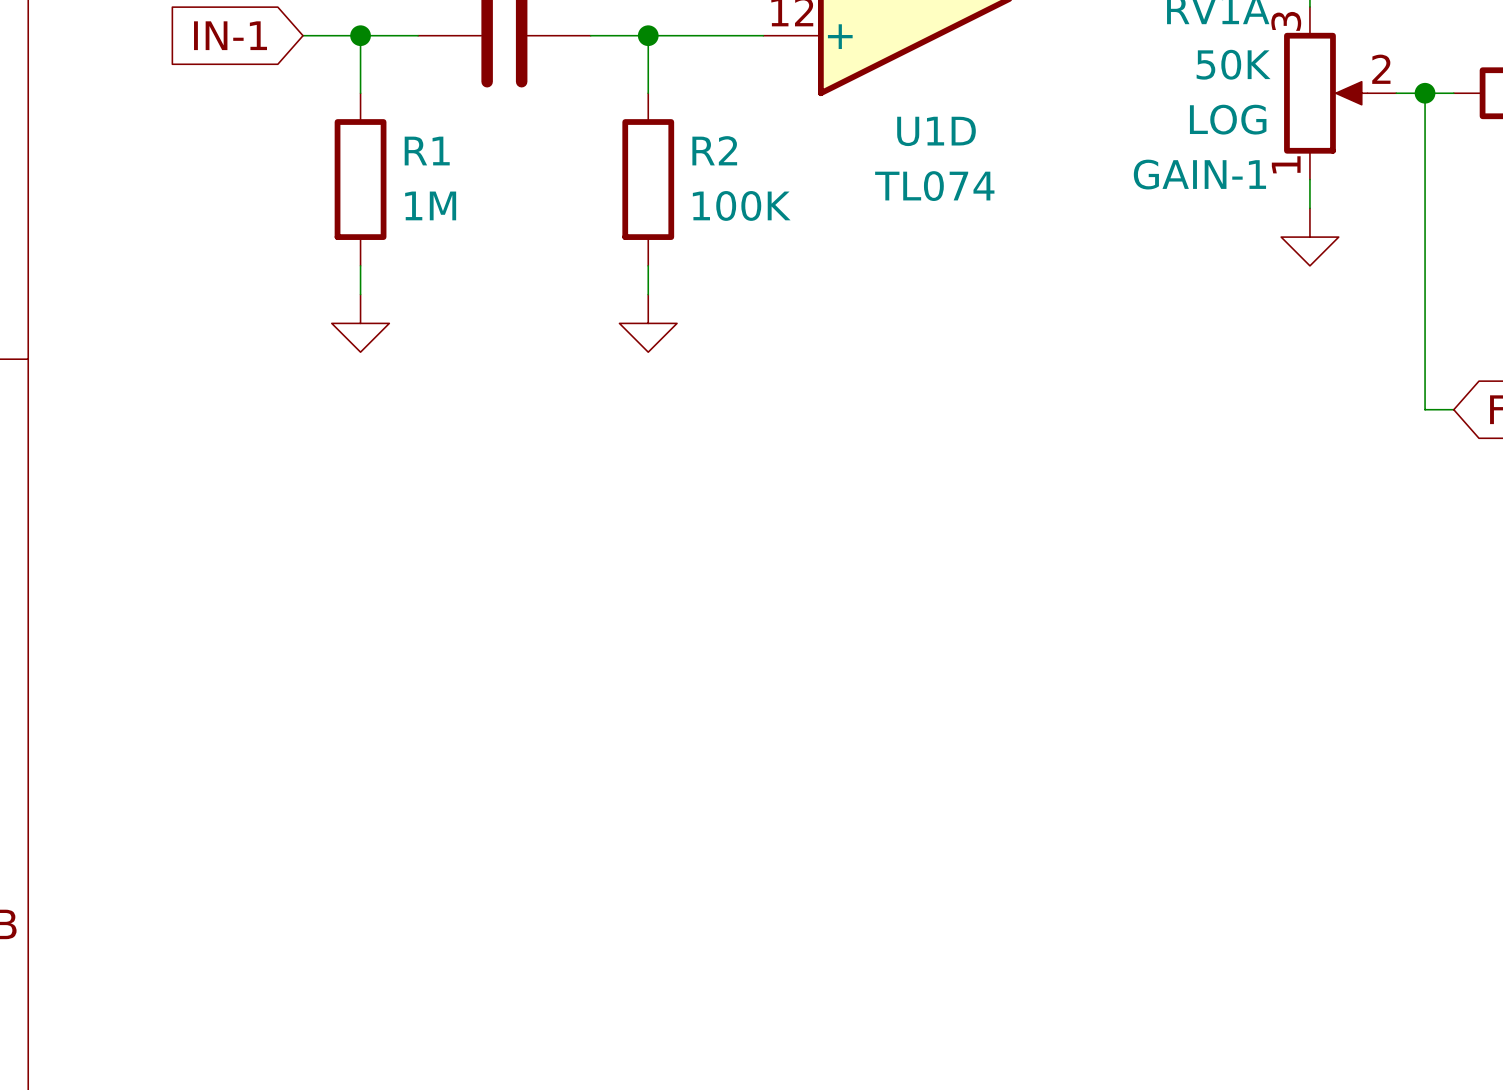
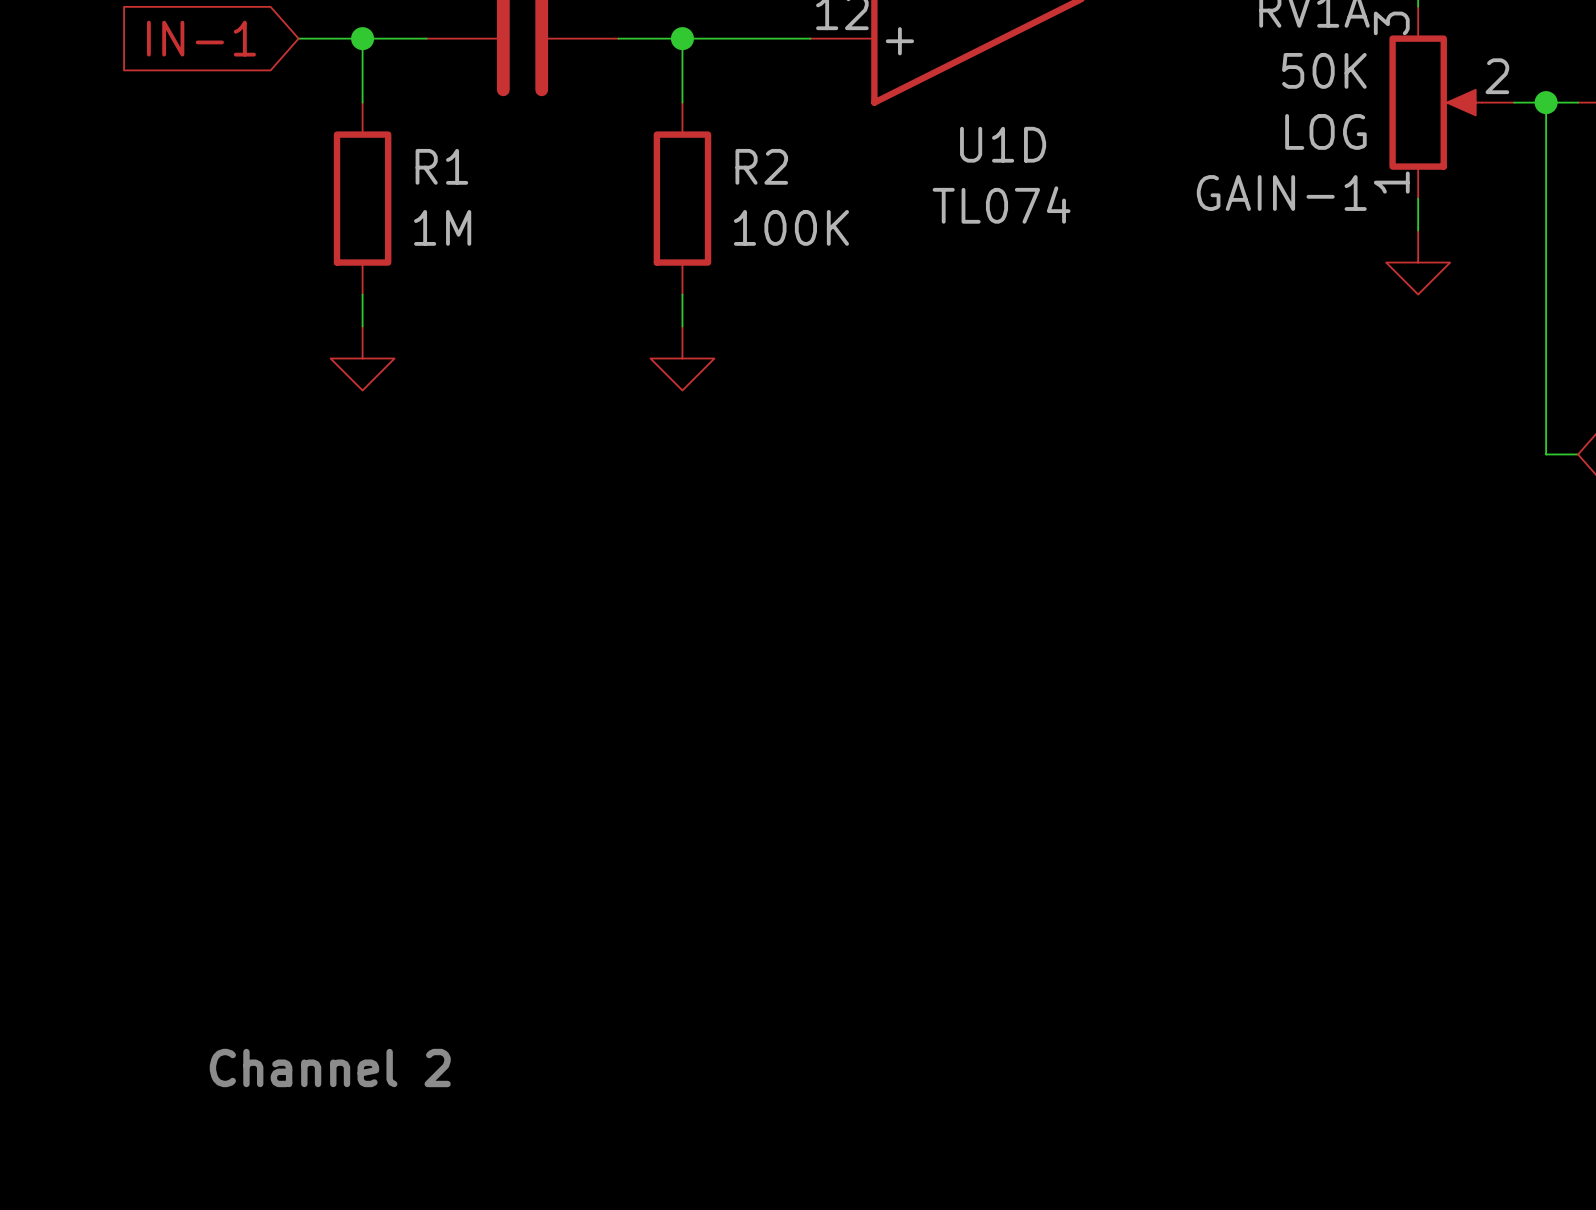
text: none -> Channel 2 (330, 1068)

